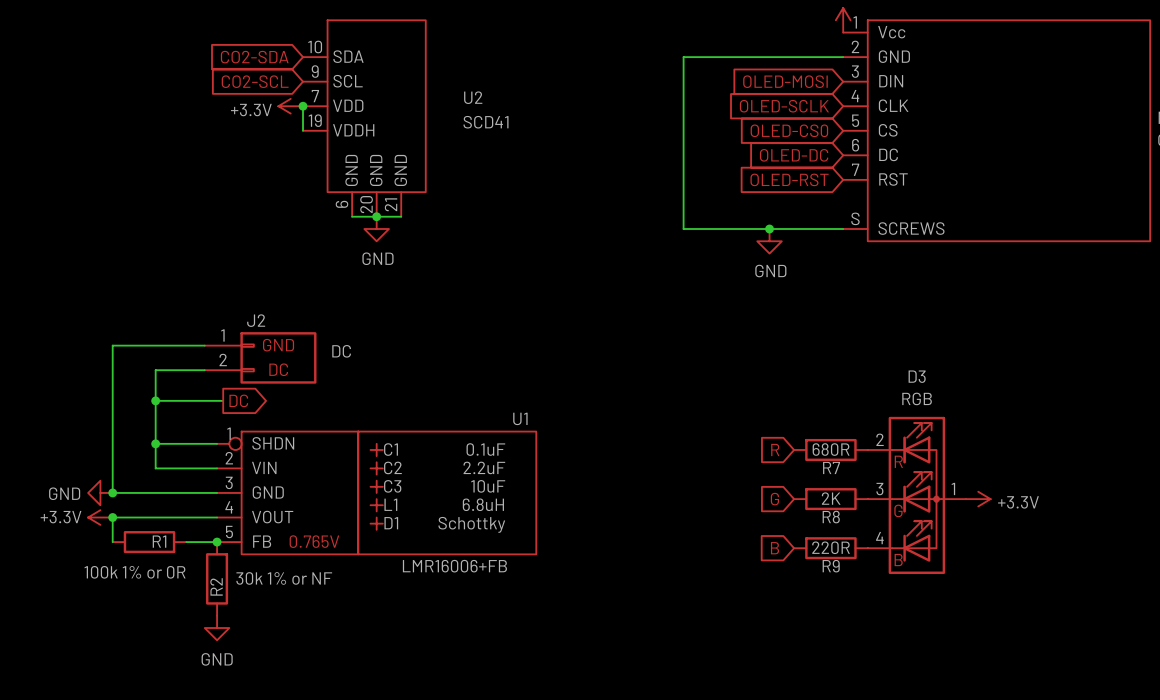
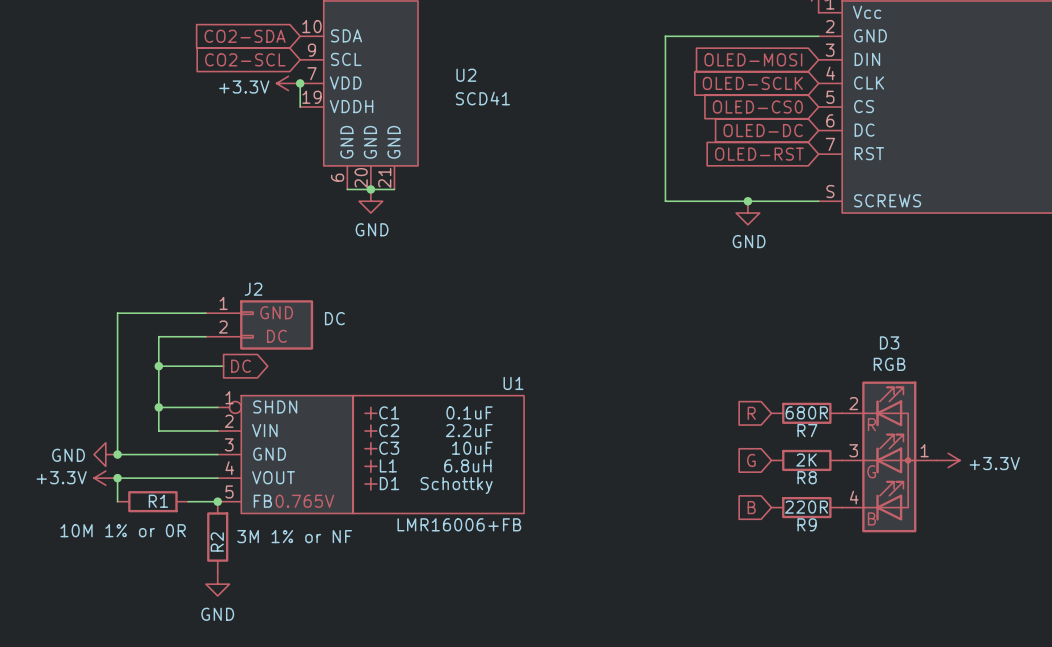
R1 value: 100k 1% or 0R (135, 572) -> 10M 1% or 0R (123, 530)
R2 value: 30k 1% or NF (284, 578) -> 3M 1% or NF (294, 536)

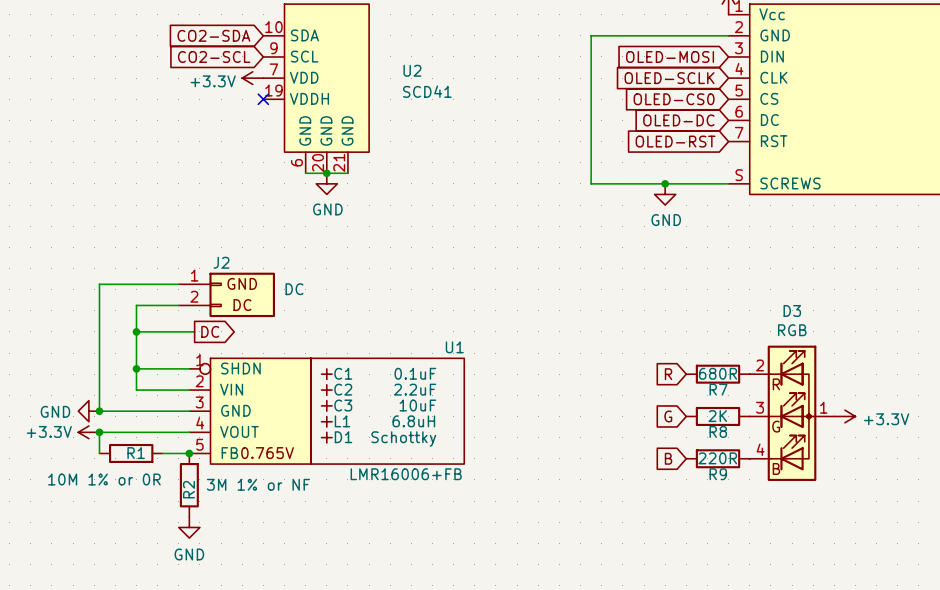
wire: (300, 83) (300, 106) -> none
junction: (300, 83) -> none
no-connect mark: none -> (263, 99)

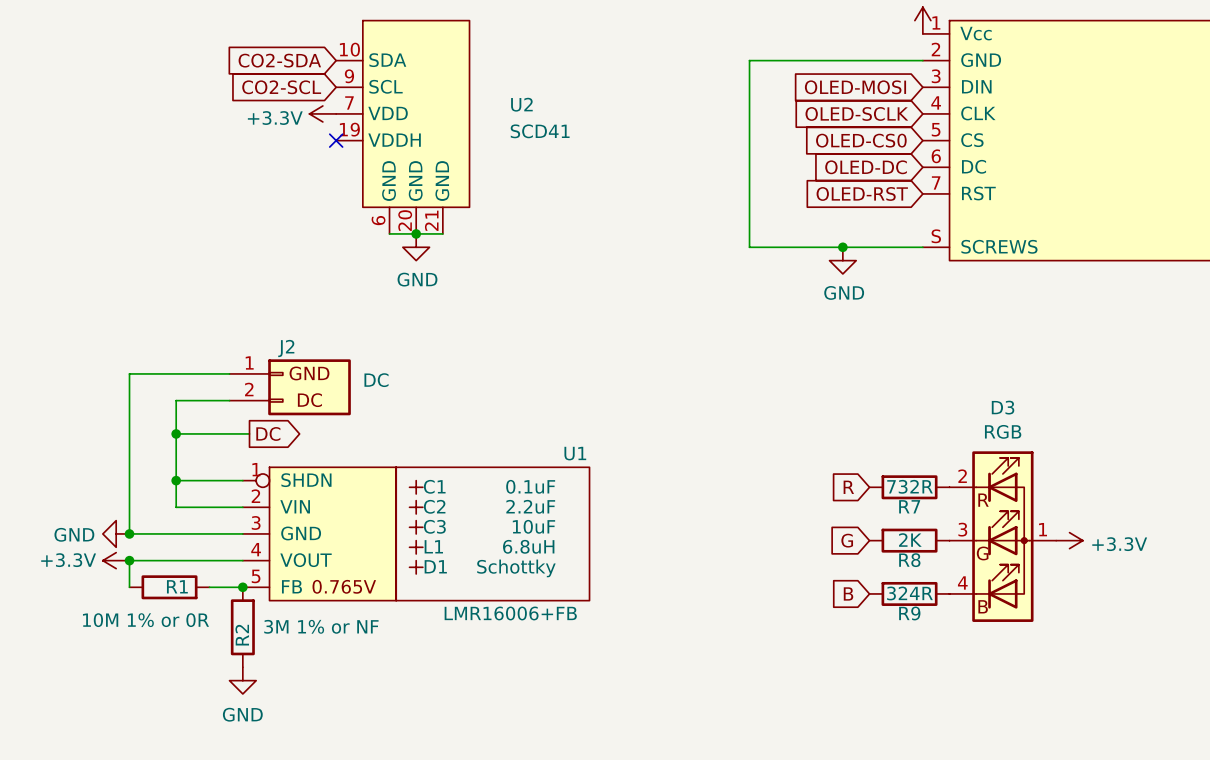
R7 value: 680R (718, 373) -> 732R (910, 486)
R9 value: 220R (717, 458) -> 324R (909, 593)

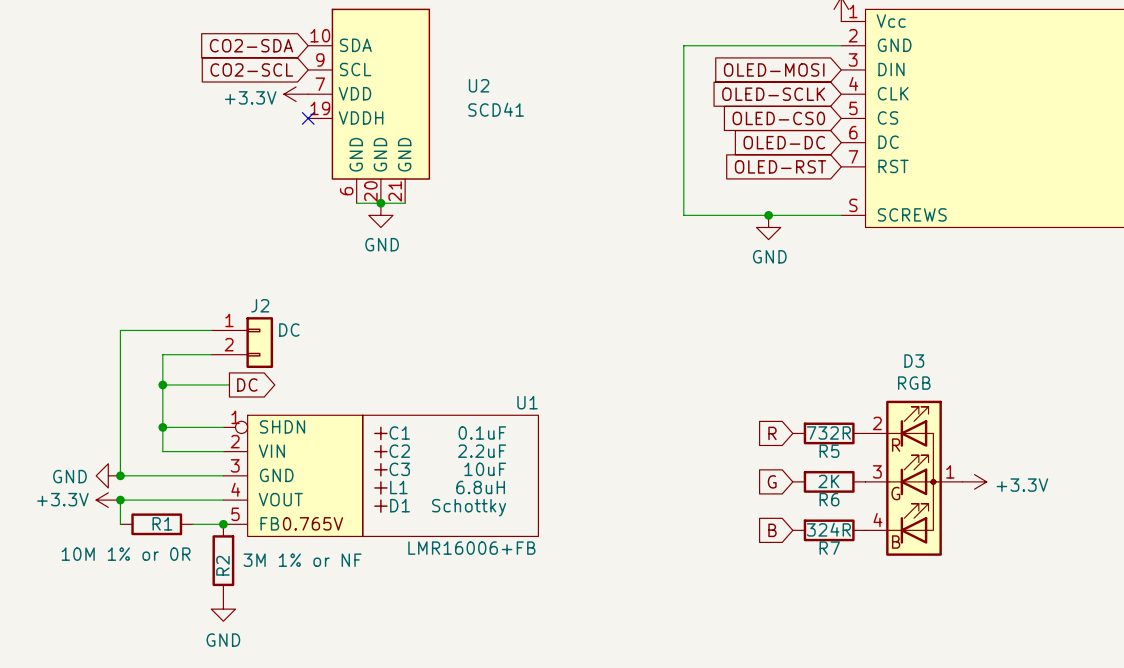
J2 symbol: [229, 359, 351, 416] -> [211, 317, 274, 369]
J2 value position: DC (376, 380) -> DC (289, 330)
R7 name: R7 (909, 506) -> R5 (829, 451)
R8 name: R8 (909, 560) -> R6 (829, 499)
R9 name: R9 (909, 613) -> R7 (829, 548)

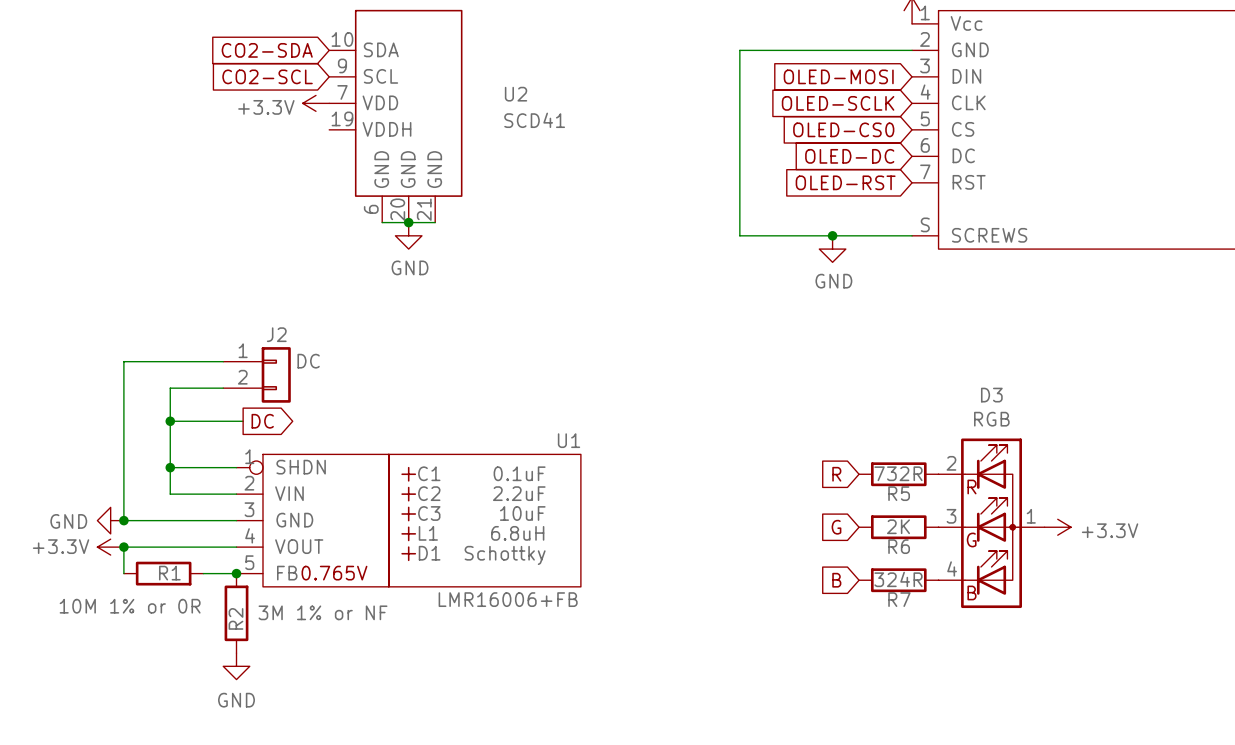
no-connect mark: (308, 118) -> none

